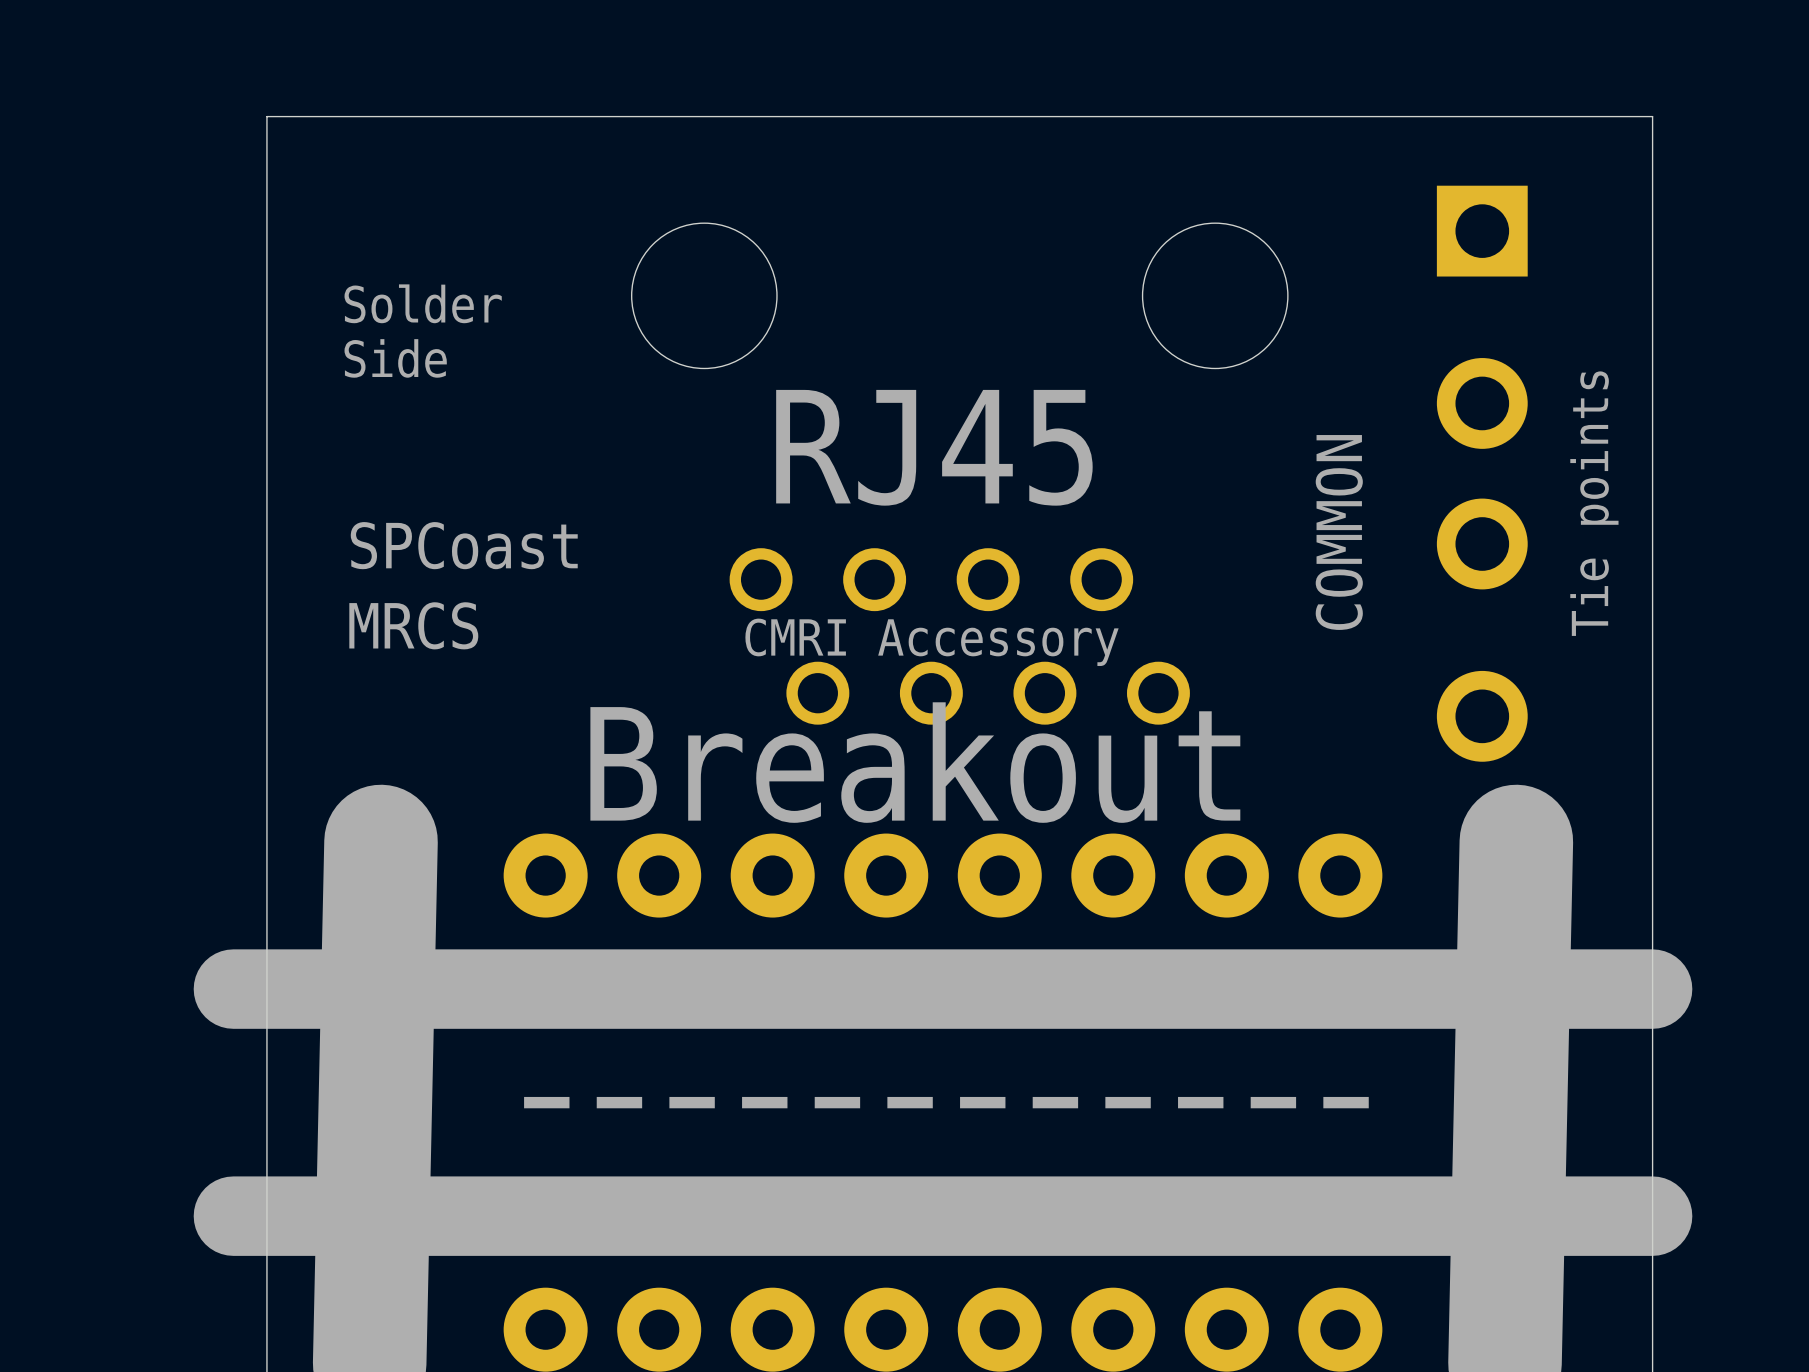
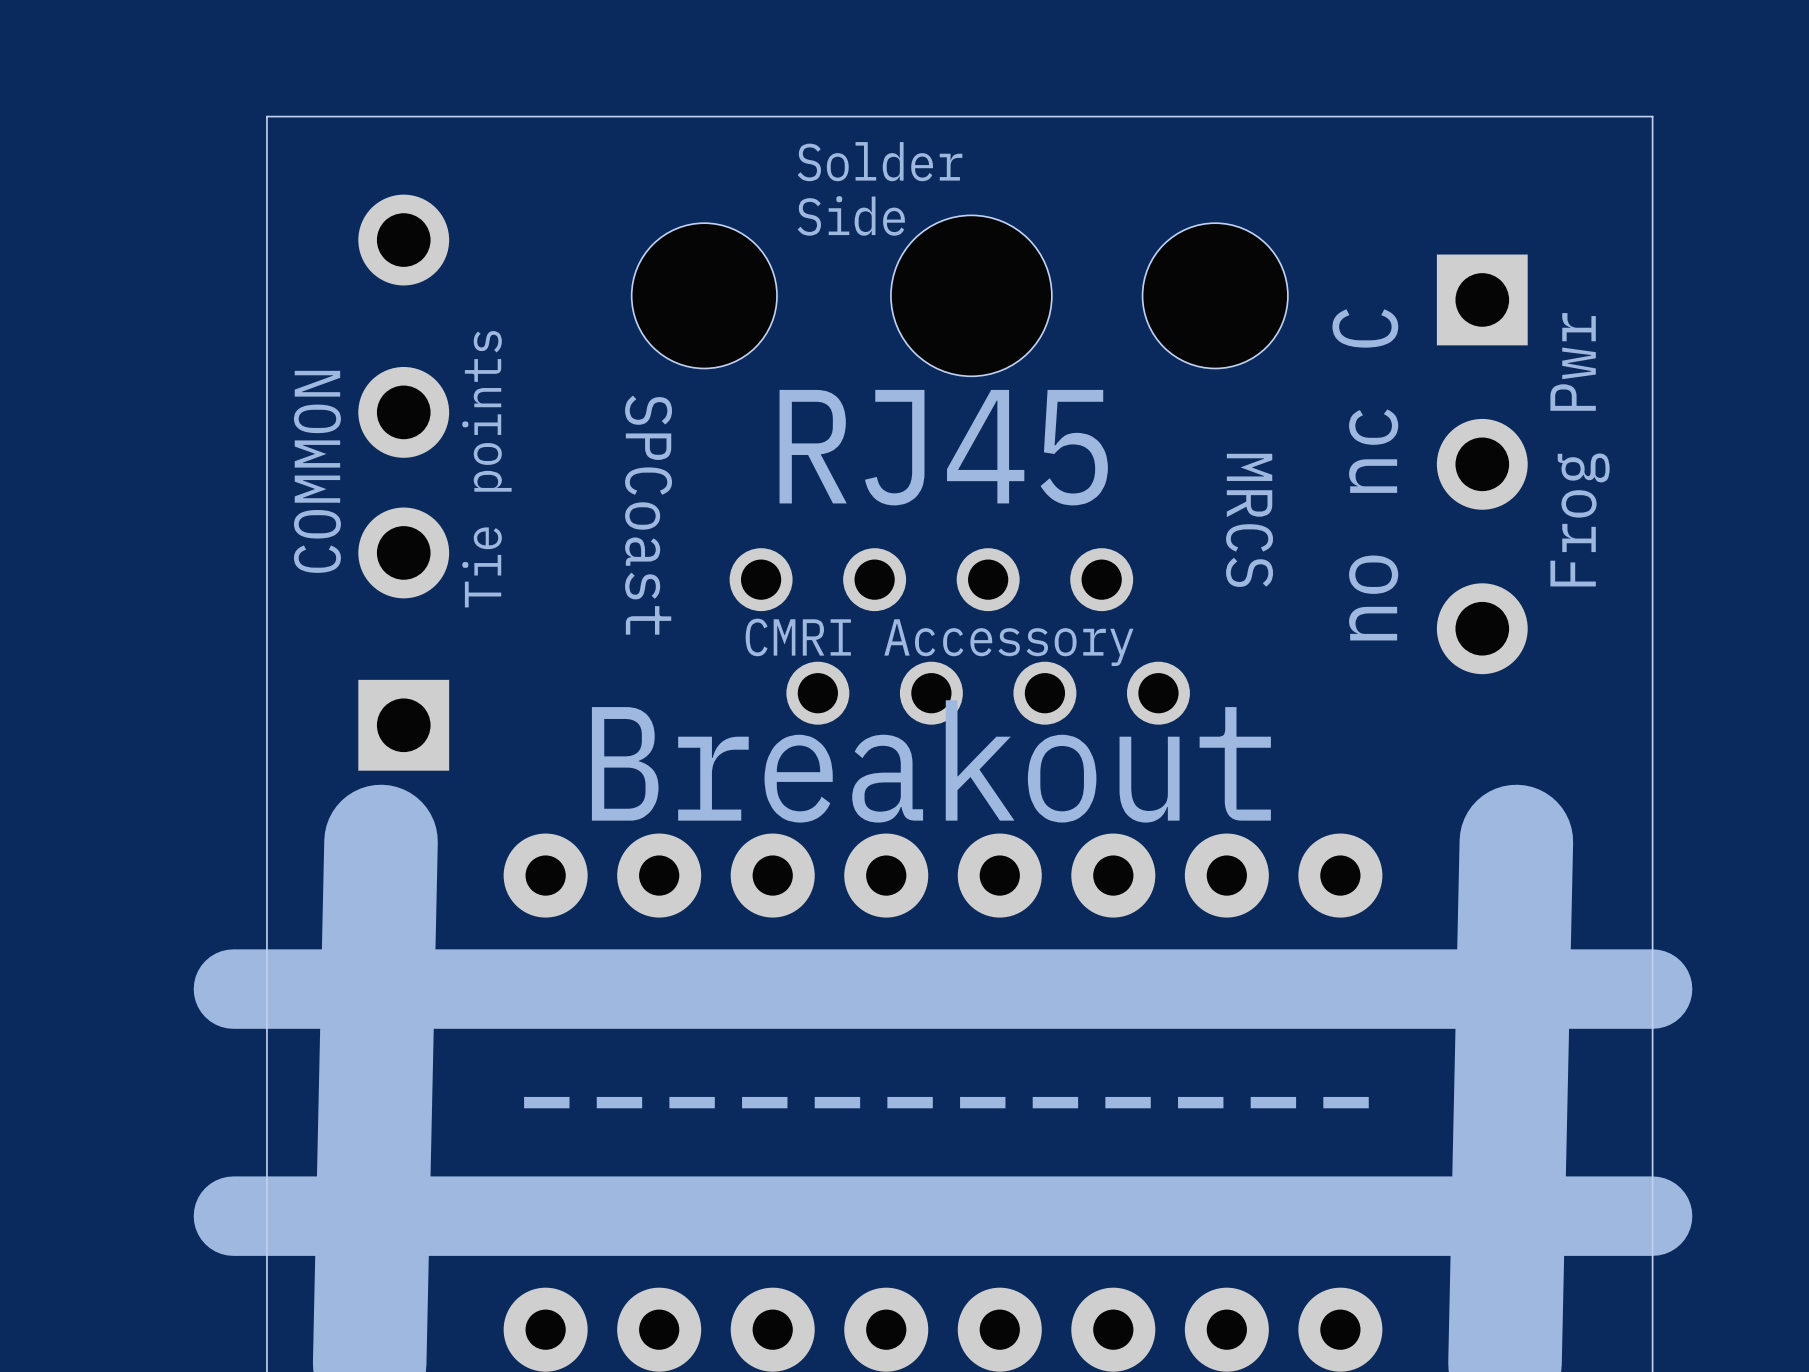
part footprint: [1436, 185, 1528, 762] -> [1436, 254, 1528, 675]
part: none -> (971, 295)
text position: Solder (423, 303) -> Solder (880, 161)
text position: Side (395, 358) -> Side (851, 215)
text: none -> Frog Pwr (1580, 449)
part: none -> (403, 482)
text position: Tie points (1594, 503) -> Tie points (486, 469)
text: none -> SPCoast (648, 515)
text: COMMON (1339, 532) -> no nc C (1365, 474)
text: SPCoast (464, 545) -> COMMON (317, 471)
text rotation: 0° (413, 625) -> 90° clockwise (1249, 520)
text position: MRCS (413, 625) -> MRCS (1249, 520)

